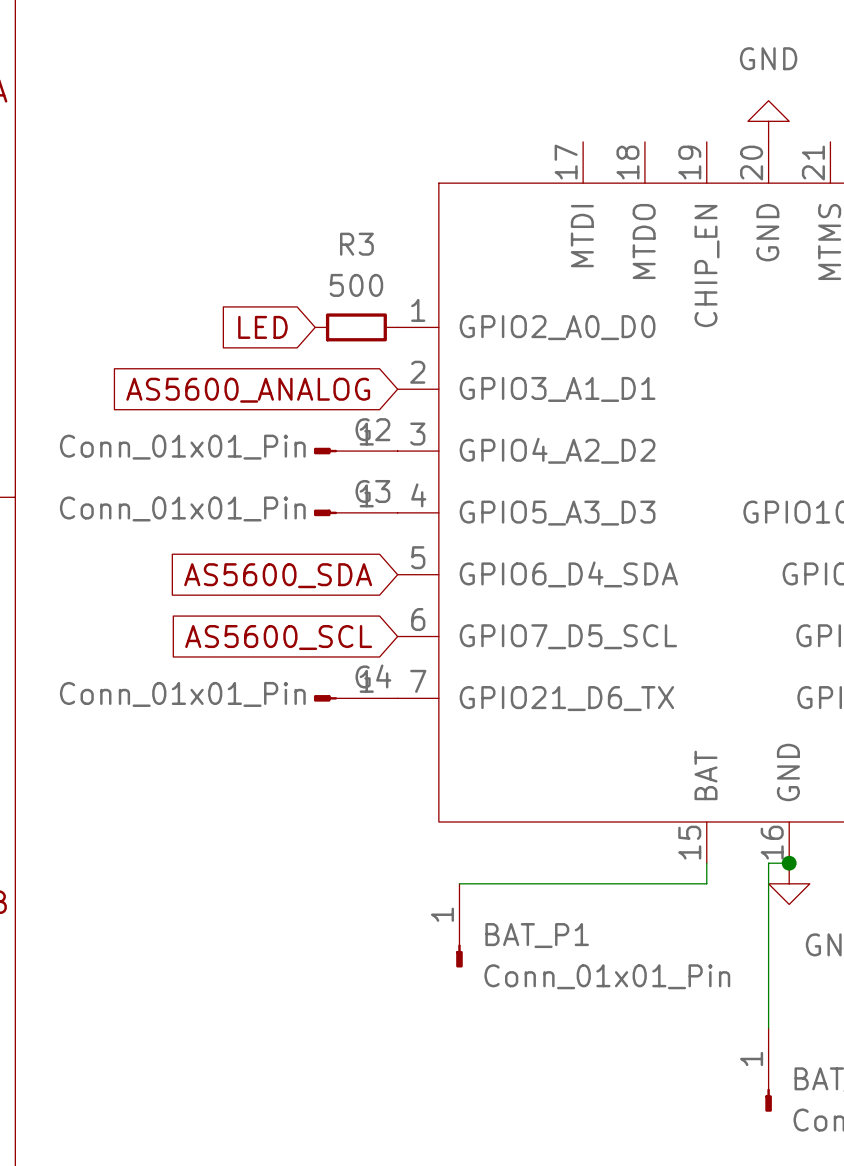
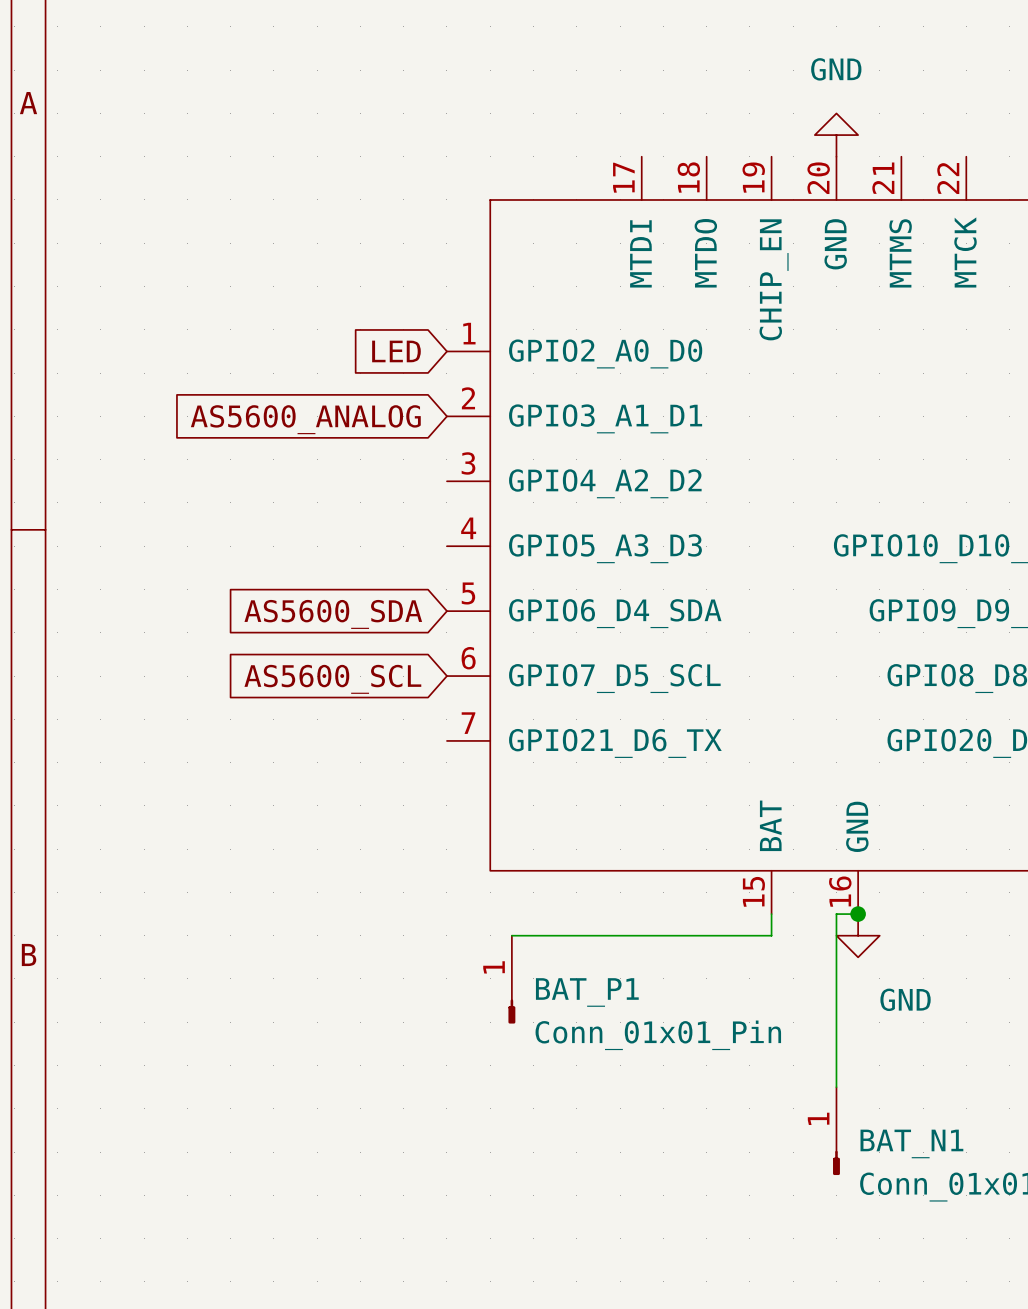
global label position: LED (262, 327) -> LED (396, 351)
R3: 500 (356, 327) -> none
G2: Conn_01x01_Pin (355, 451) -> none
G3: Conn_01x01_Pin (355, 512) -> none
G4: Conn_01x01_Pin (355, 698) -> none

